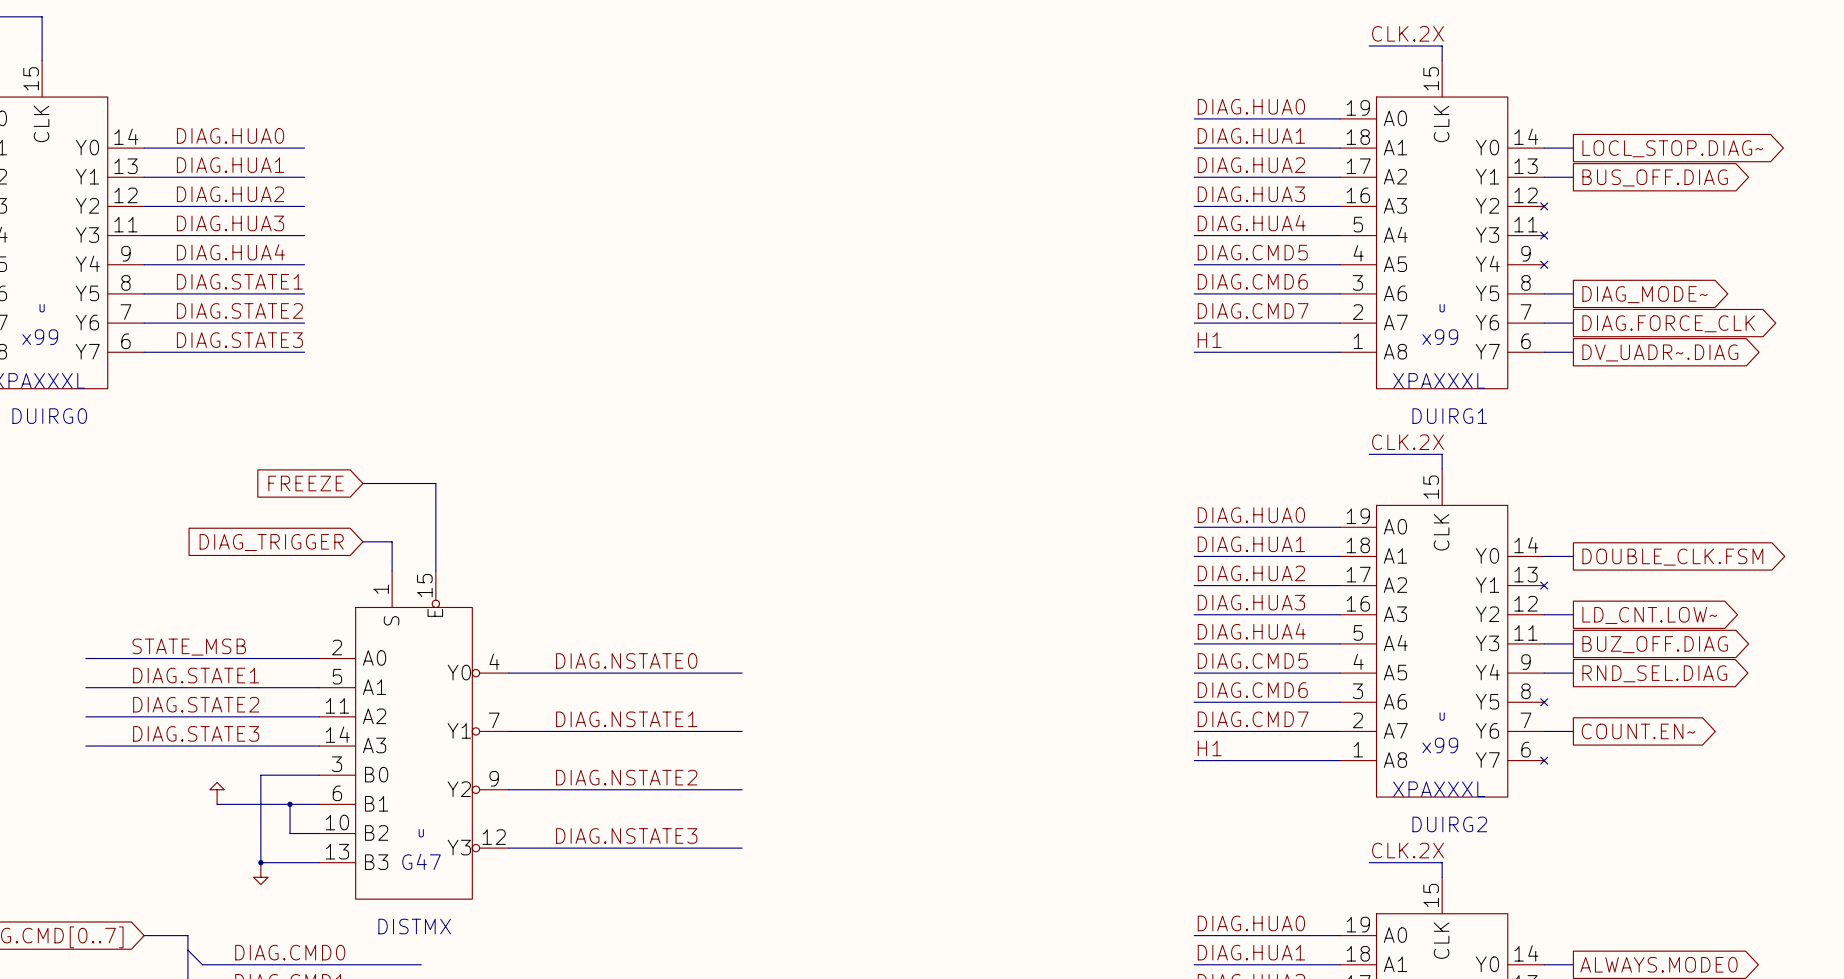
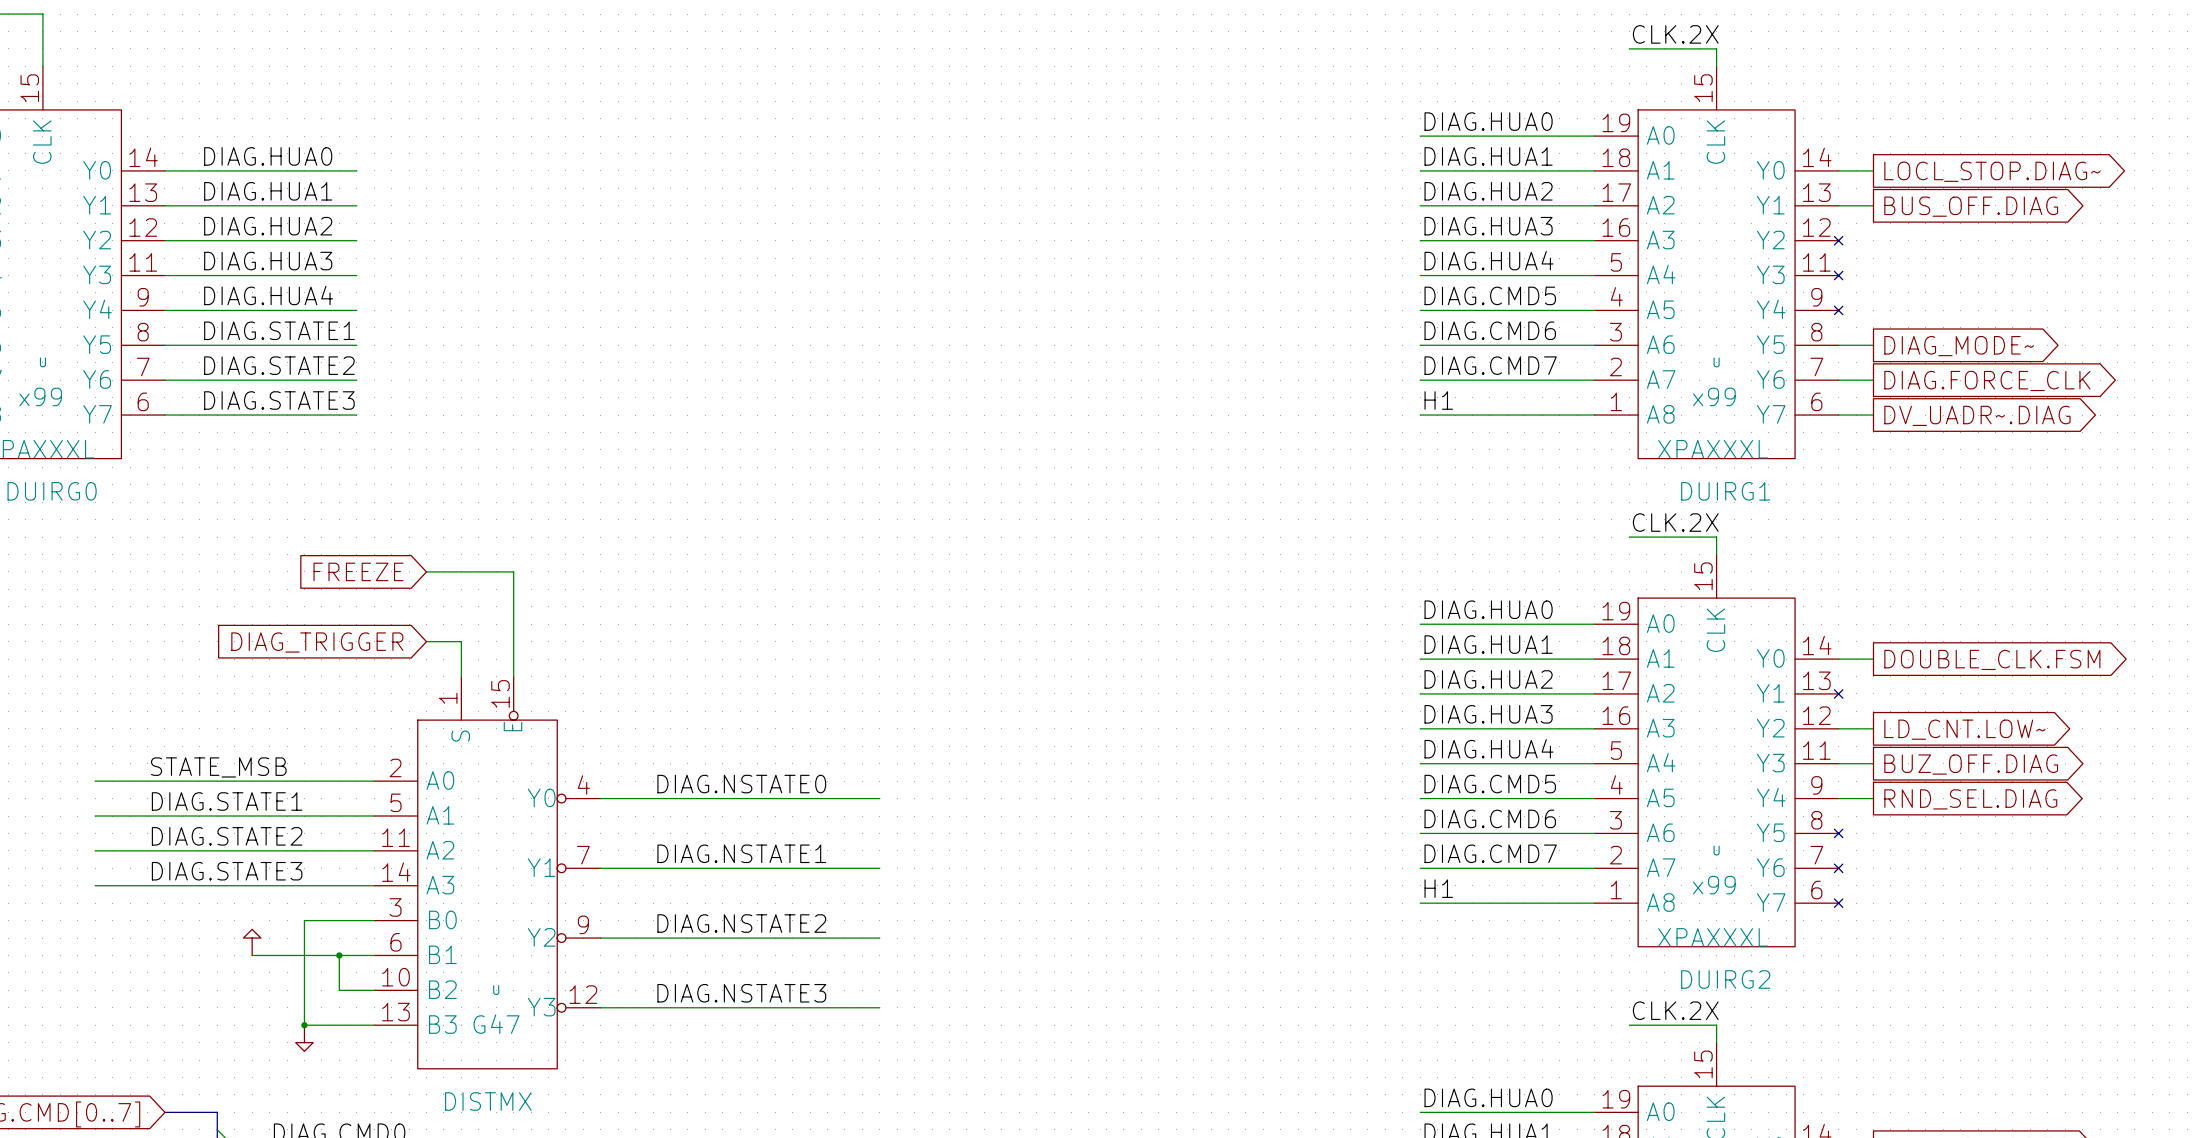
wire: (1544, 731) (1573, 731) -> none
no-connect mark: none -> (1838, 868)
global label: COUNT.EN~ (1638, 731) -> none

